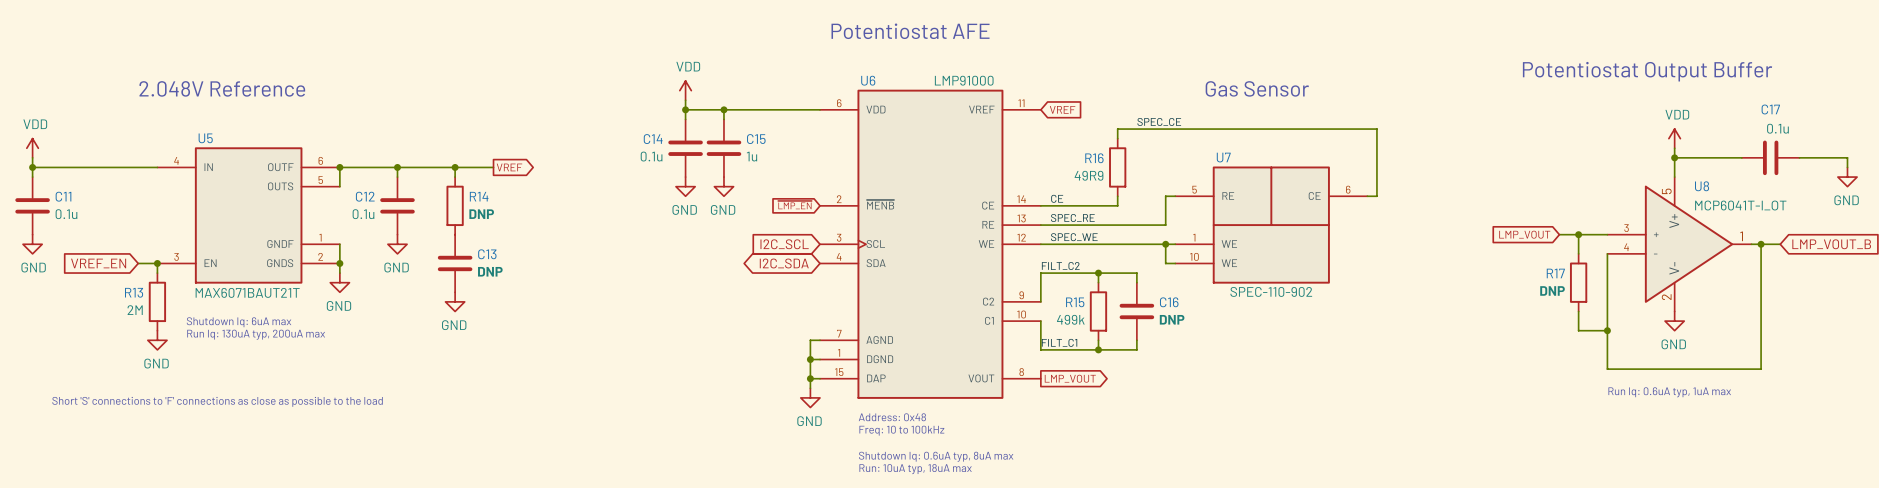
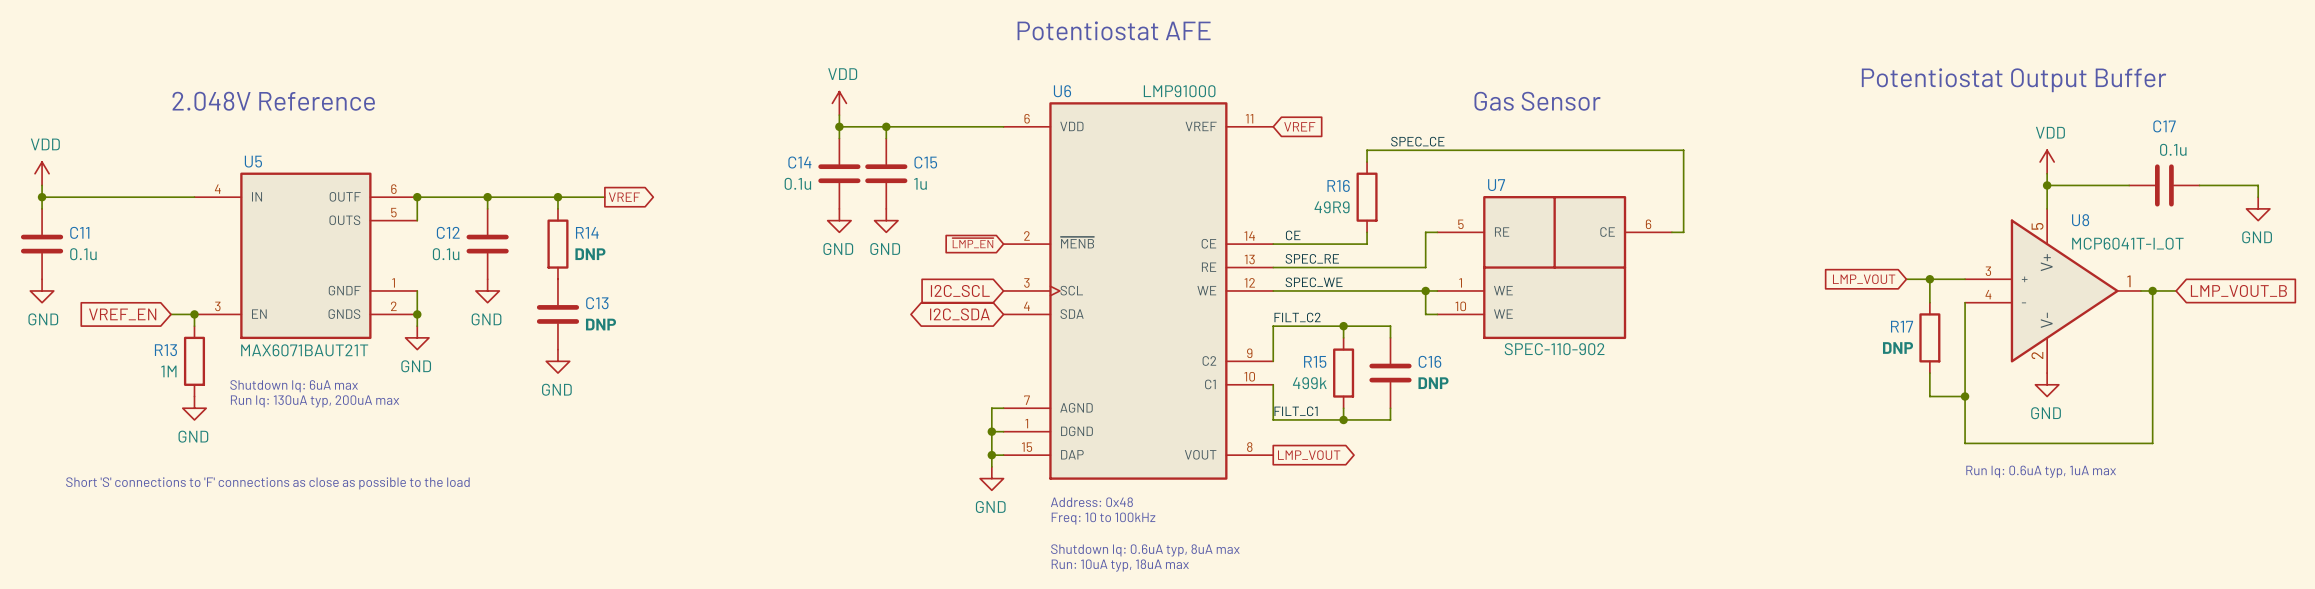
R13 value: 2M (135, 310) -> 1M (168, 371)

